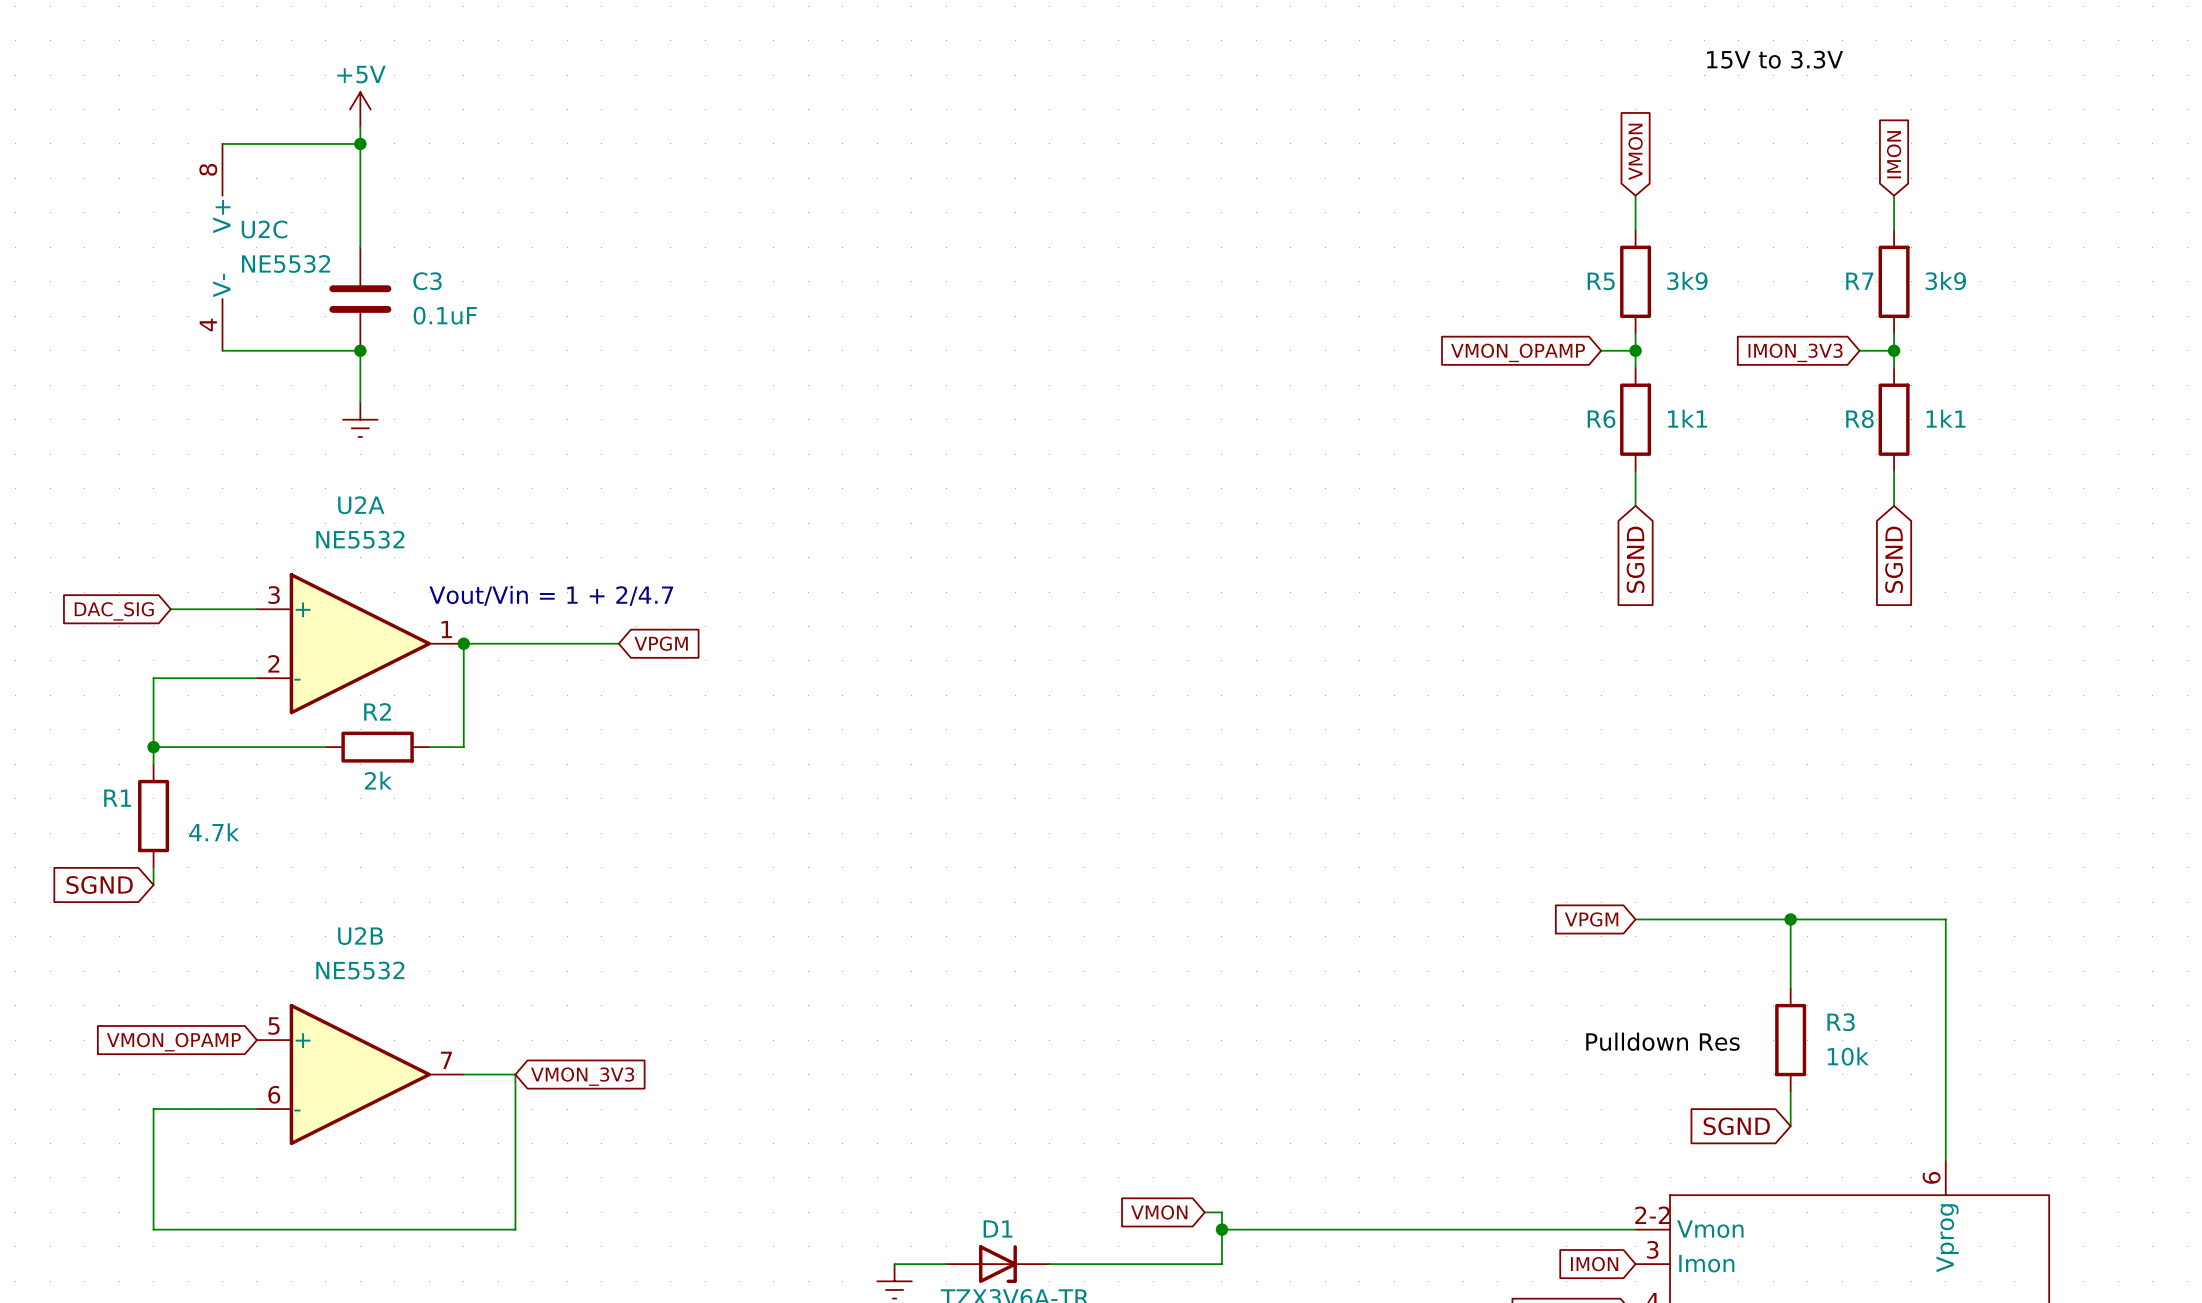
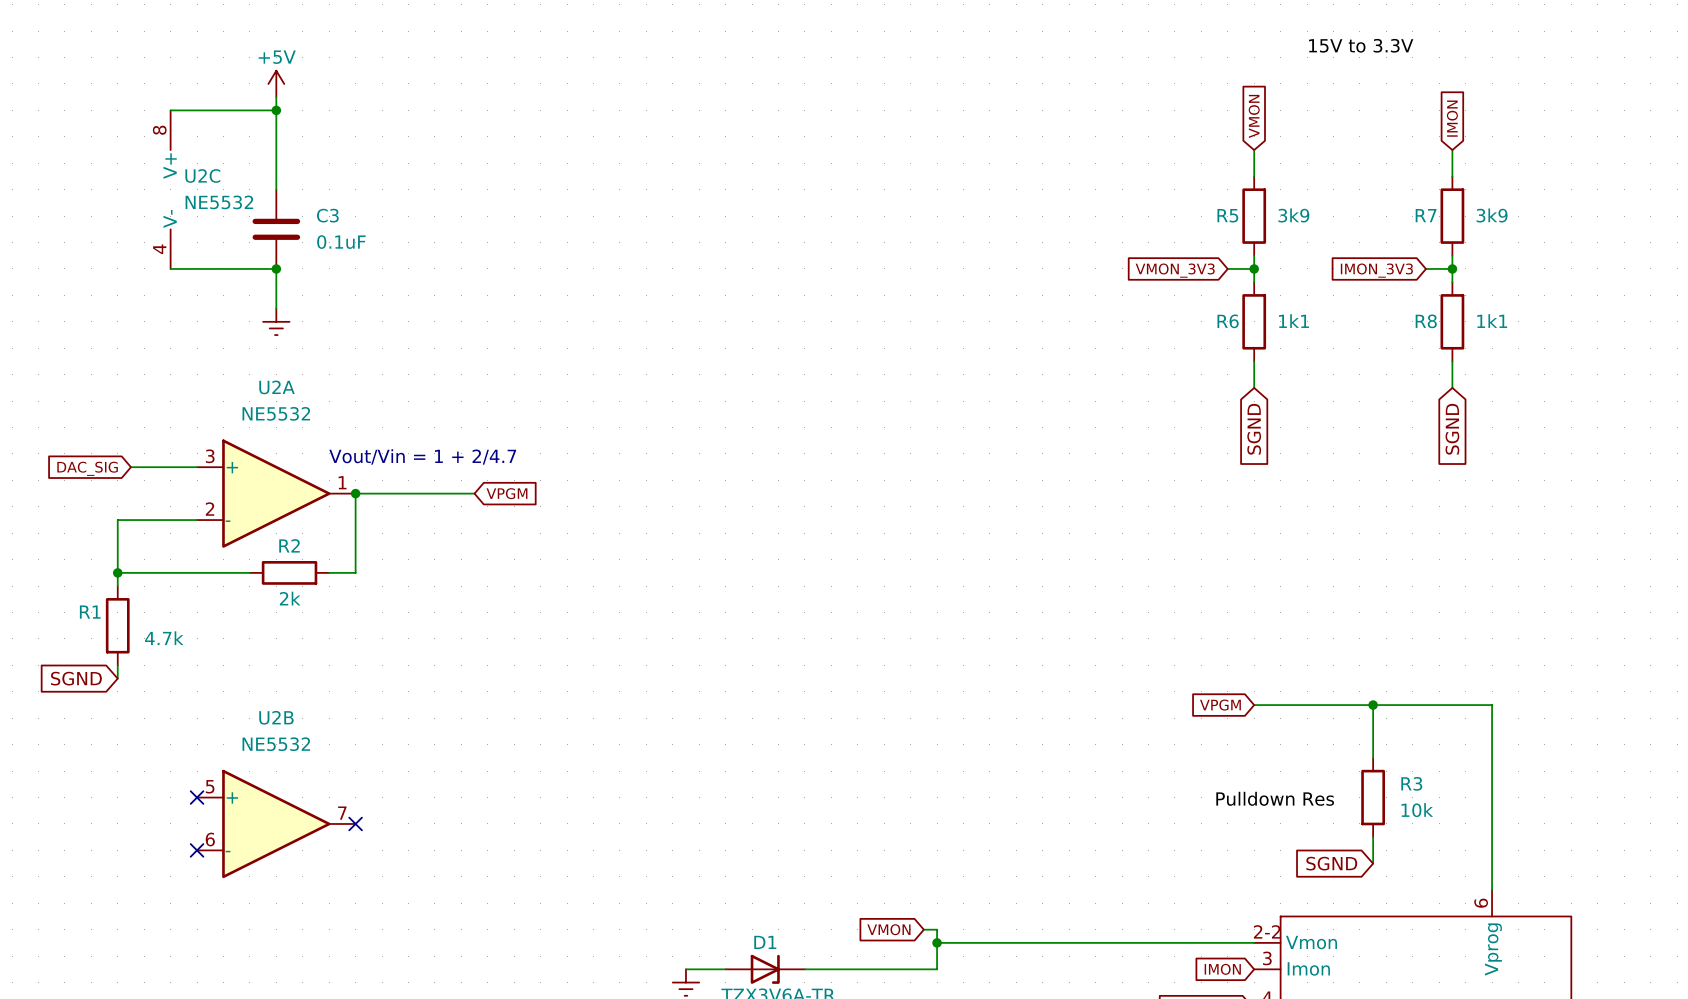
global label: VMON_OPAMP (1518, 352) -> VMON_3V3 (1175, 270)
no-connect mark: none -> (197, 797)
global label: VMON_OPAMP (173, 1042) -> none
wire: (463, 1074) (515, 1074) (515, 1229) (153, 1229) (153, 1109) (256, 1109) -> none
no-connect mark: none -> (355, 823)
global label: VMON_3V3 (582, 1076) -> none
no-connect mark: none -> (197, 850)

